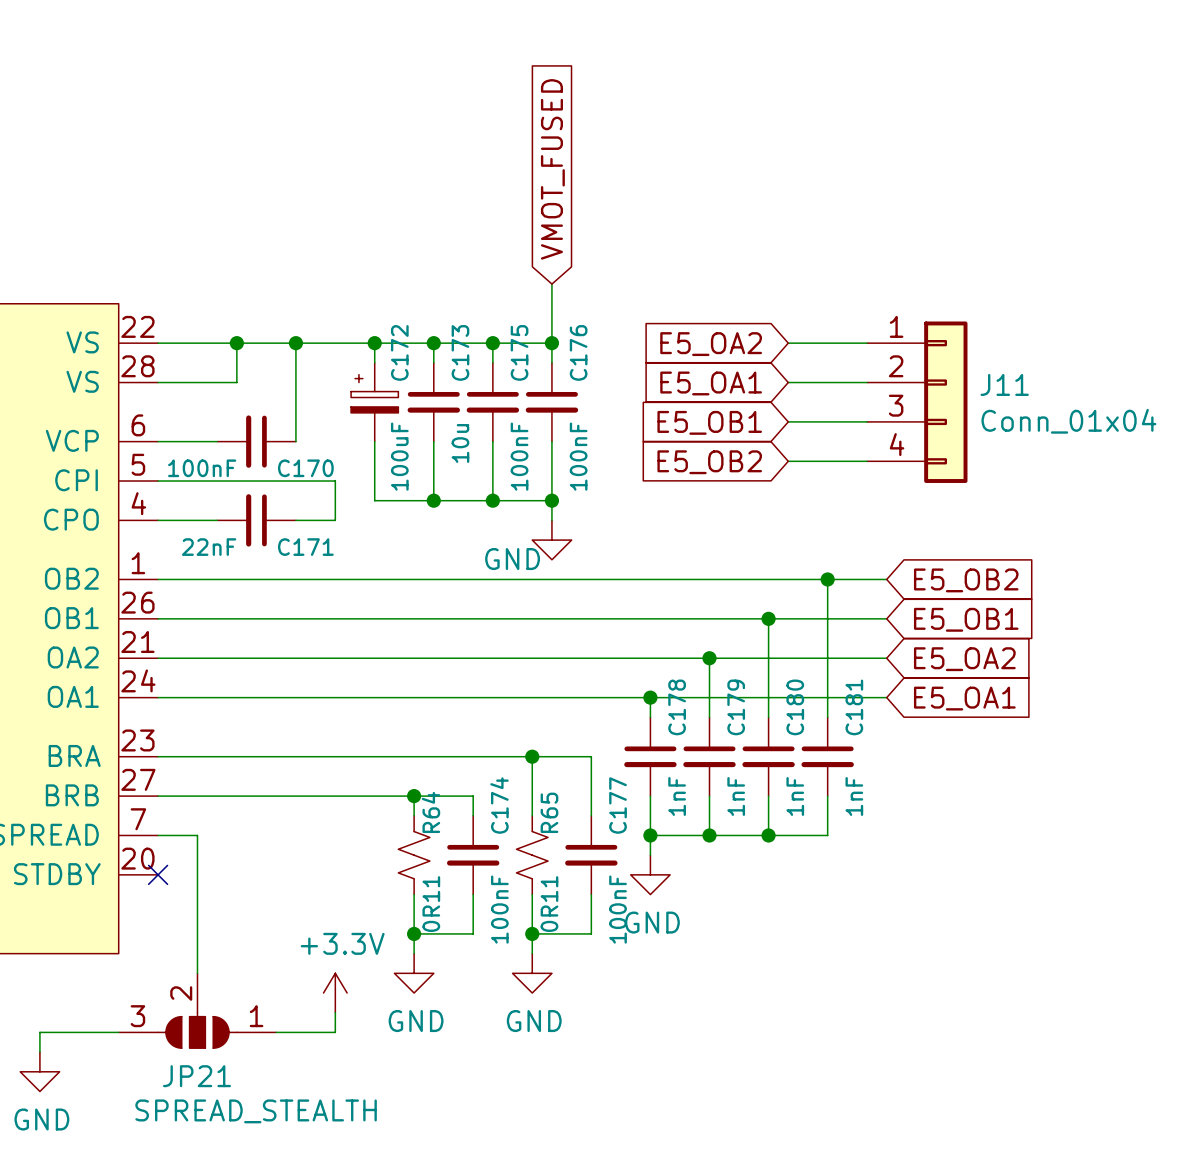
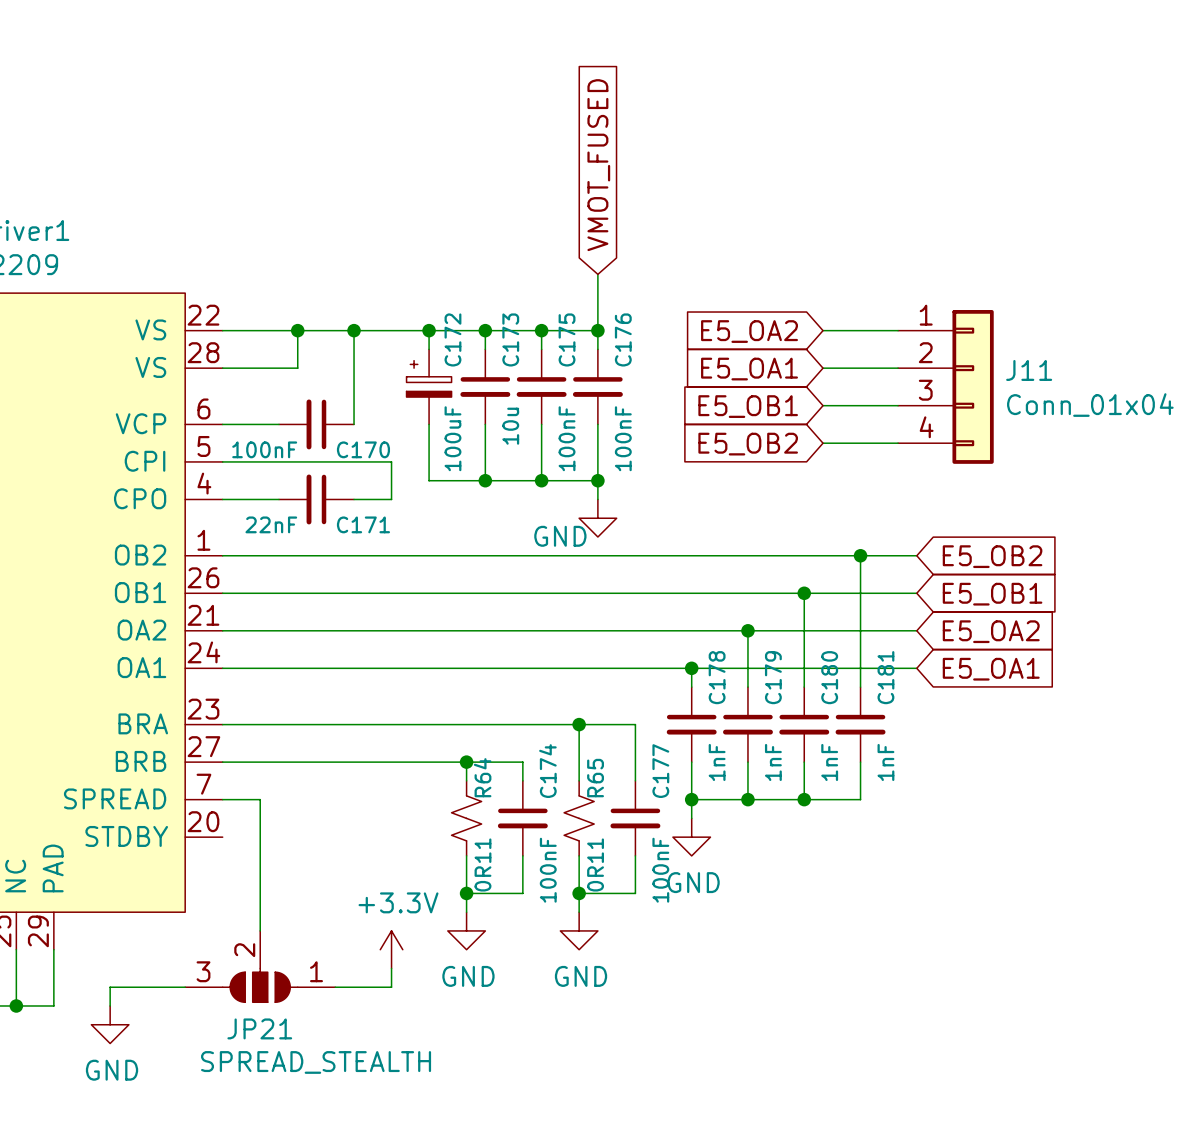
no-connect mark: (158, 874) -> none

